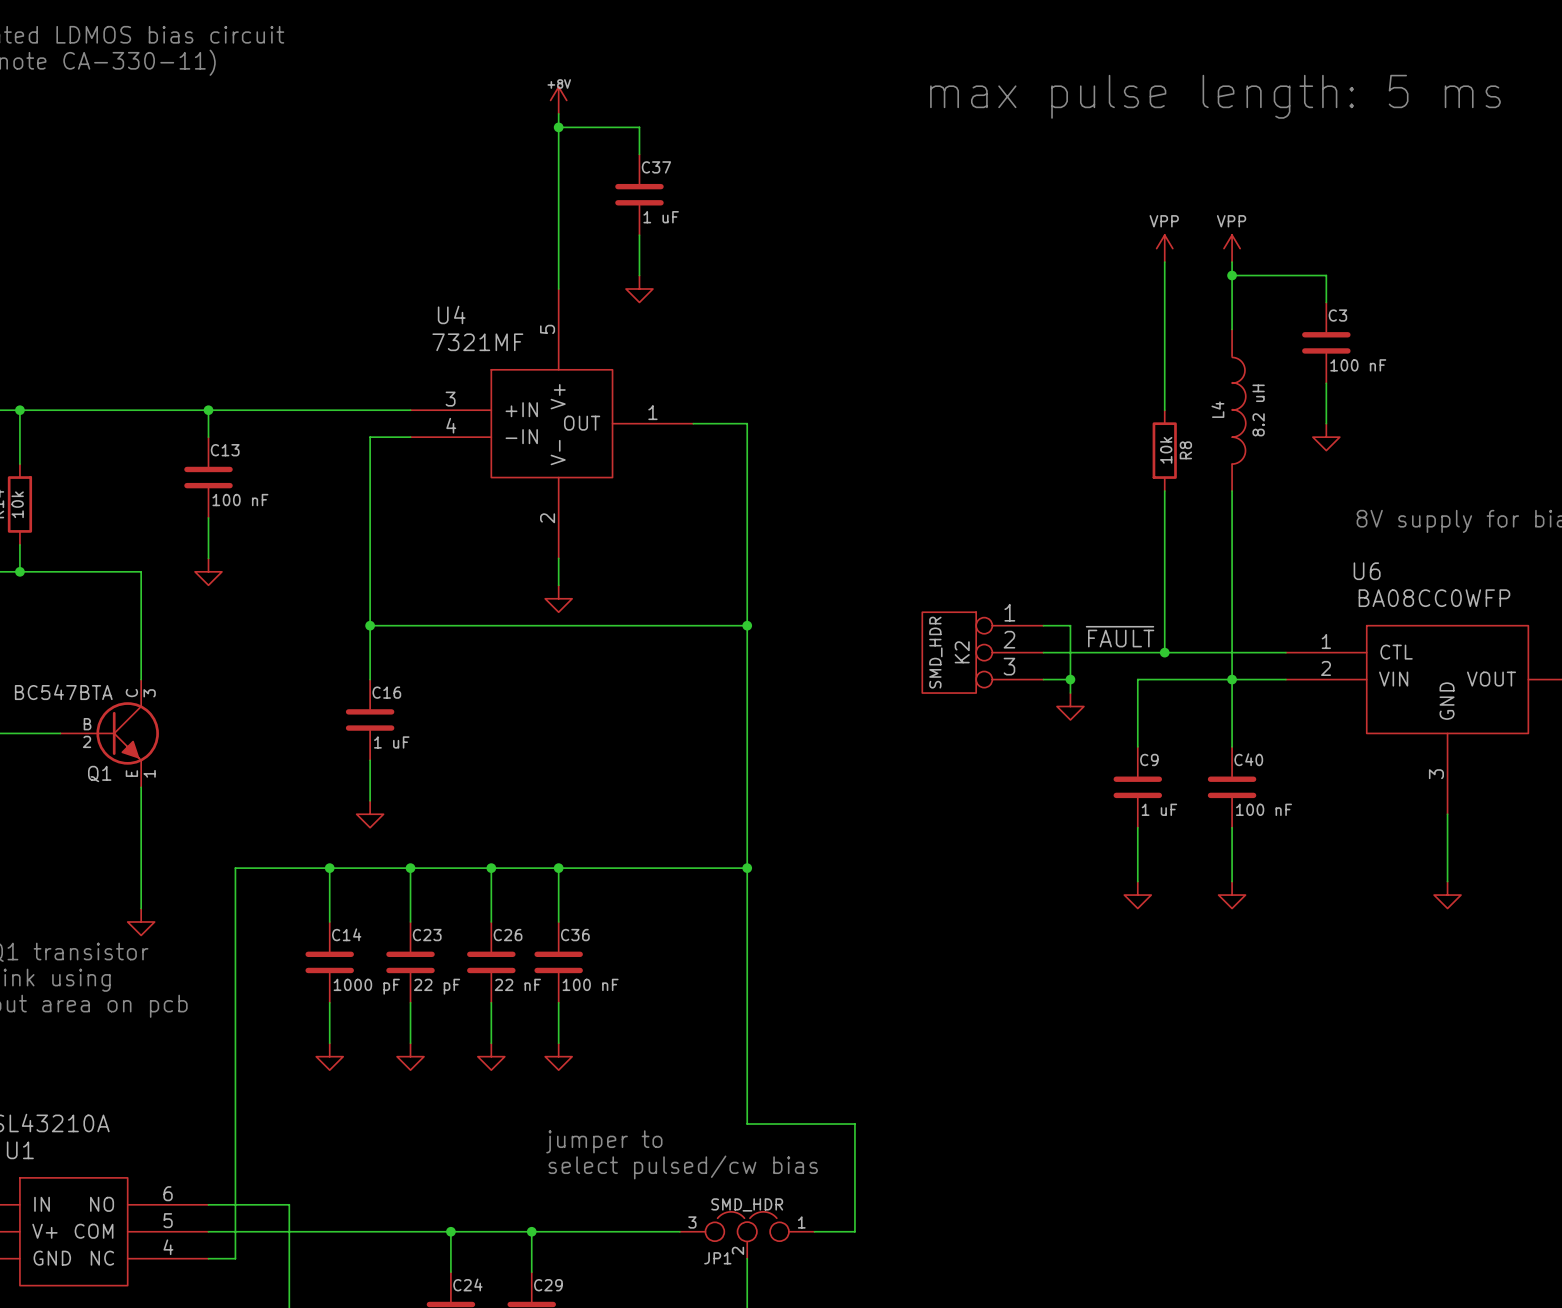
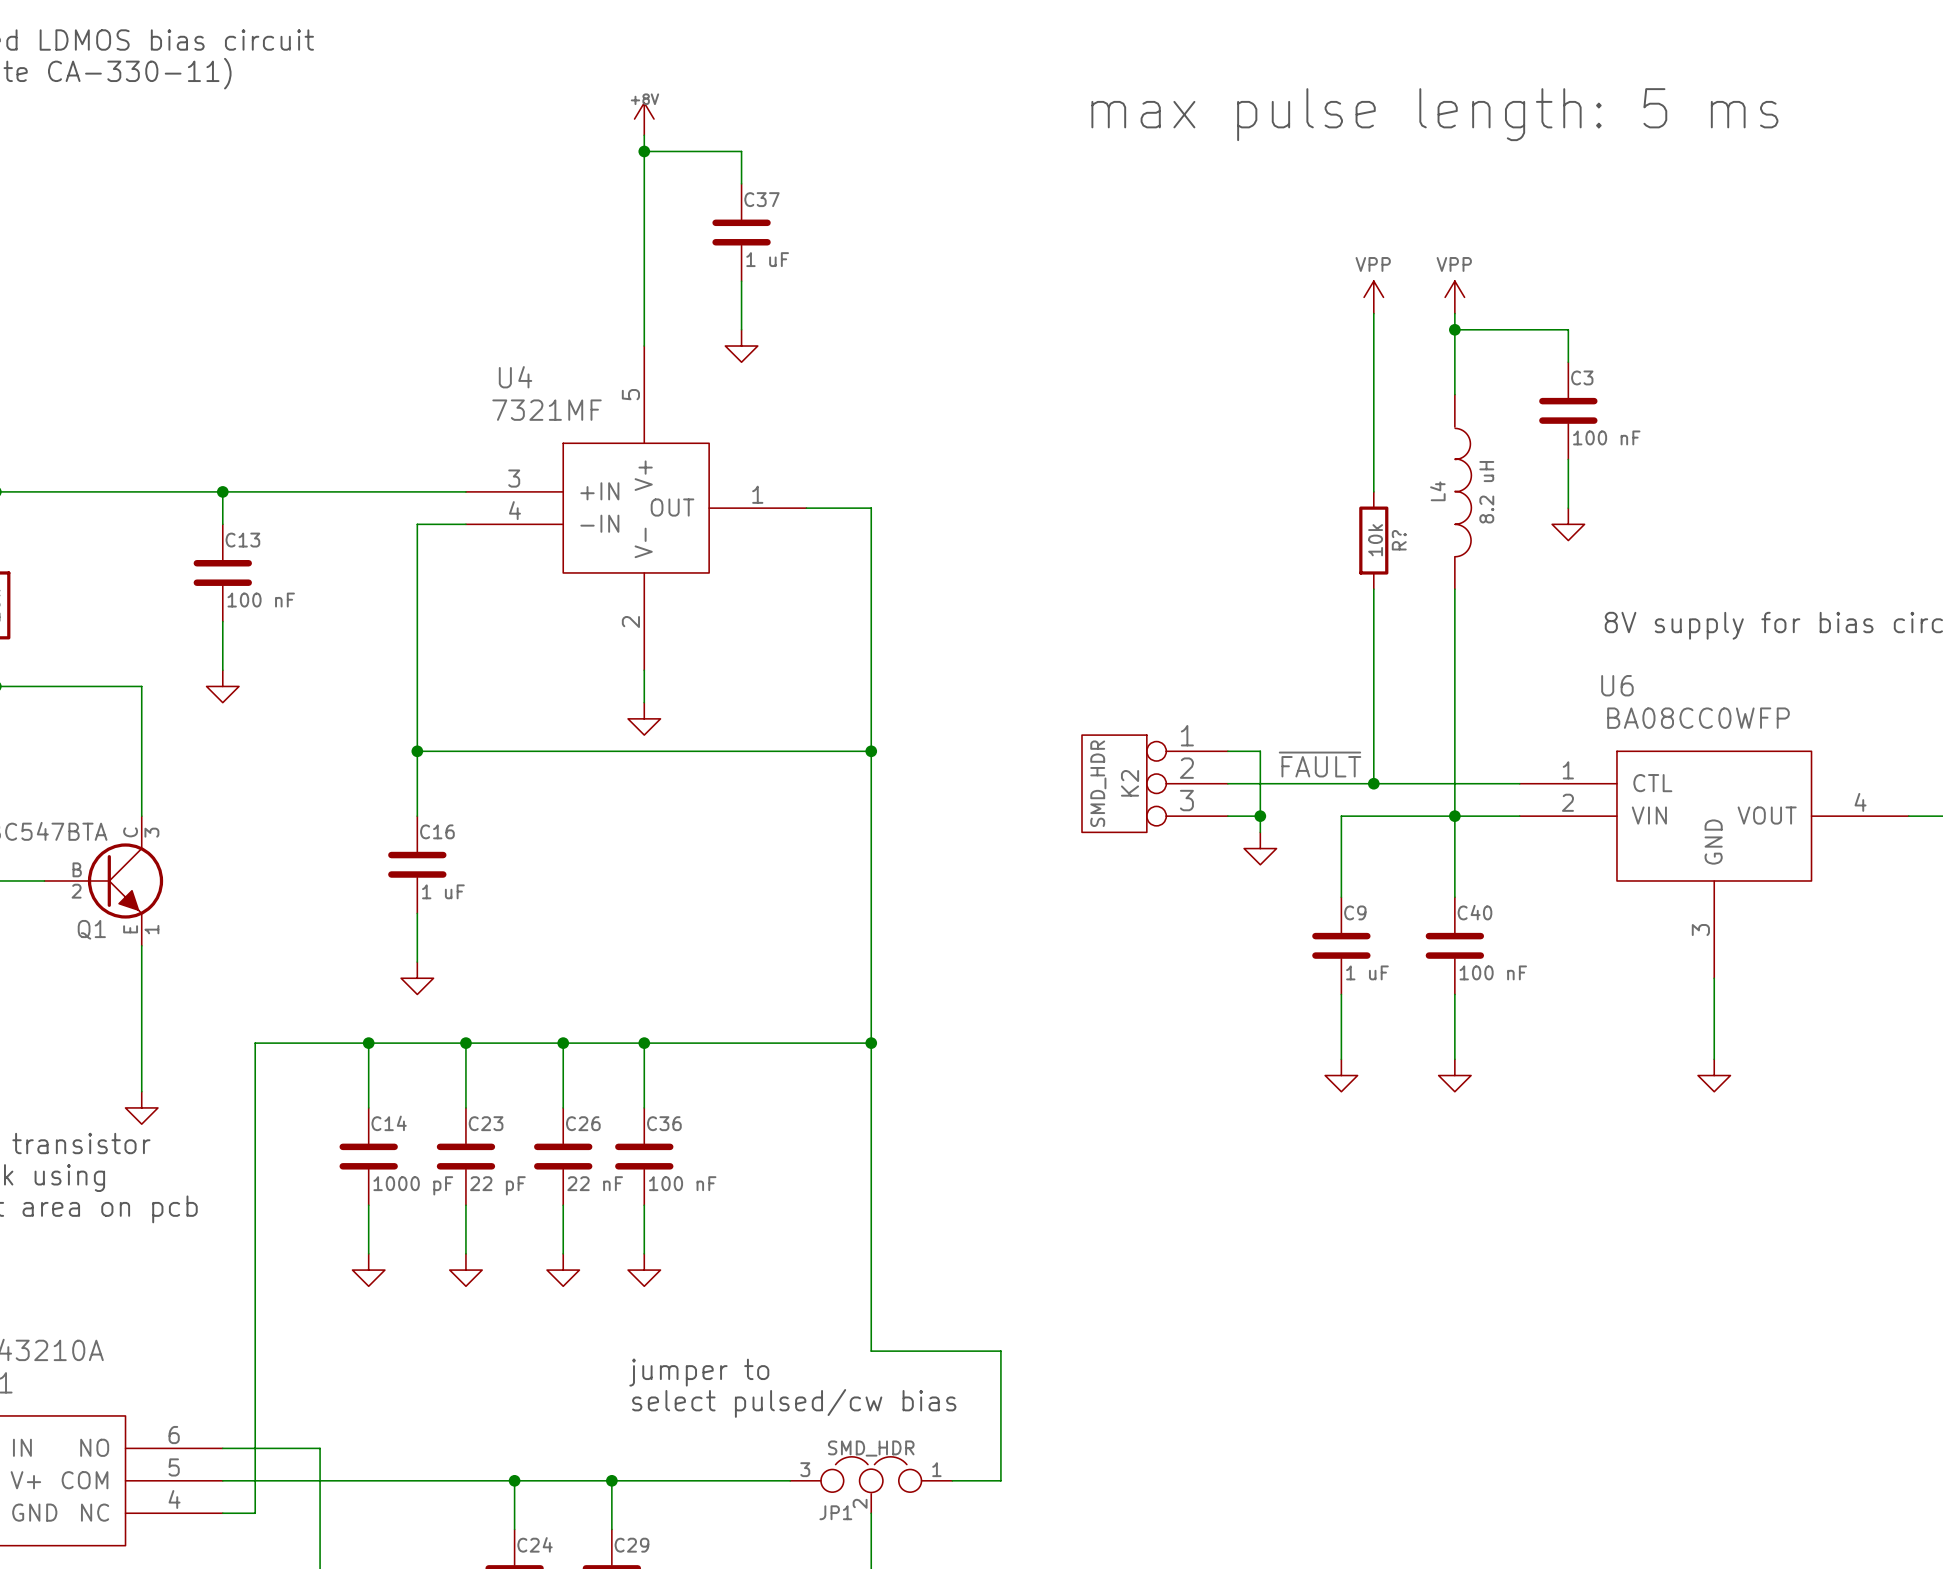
R8 name: R8 (1185, 450) -> R? (1399, 540)

